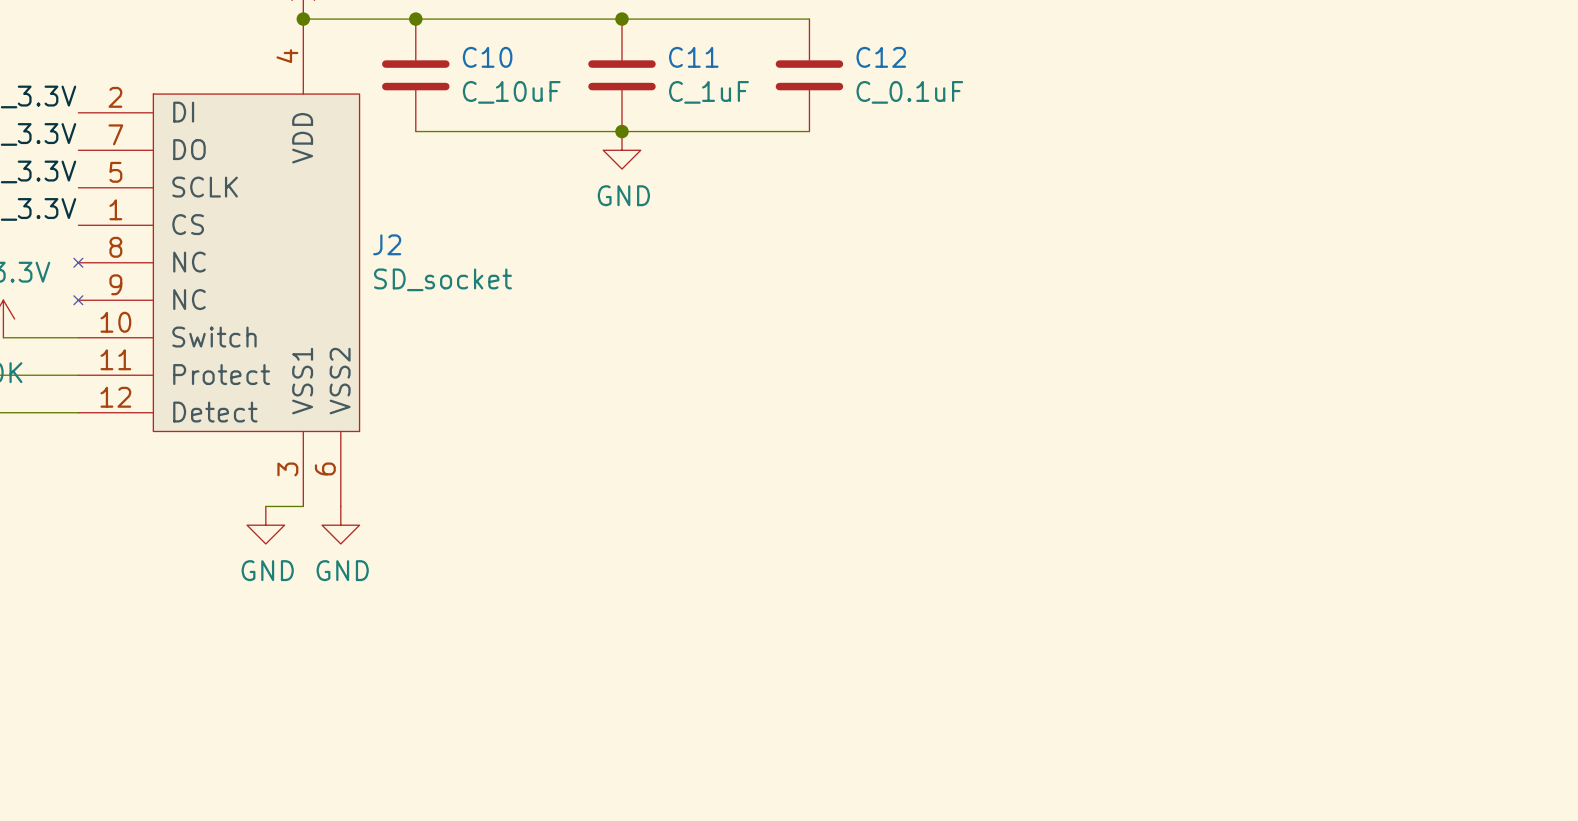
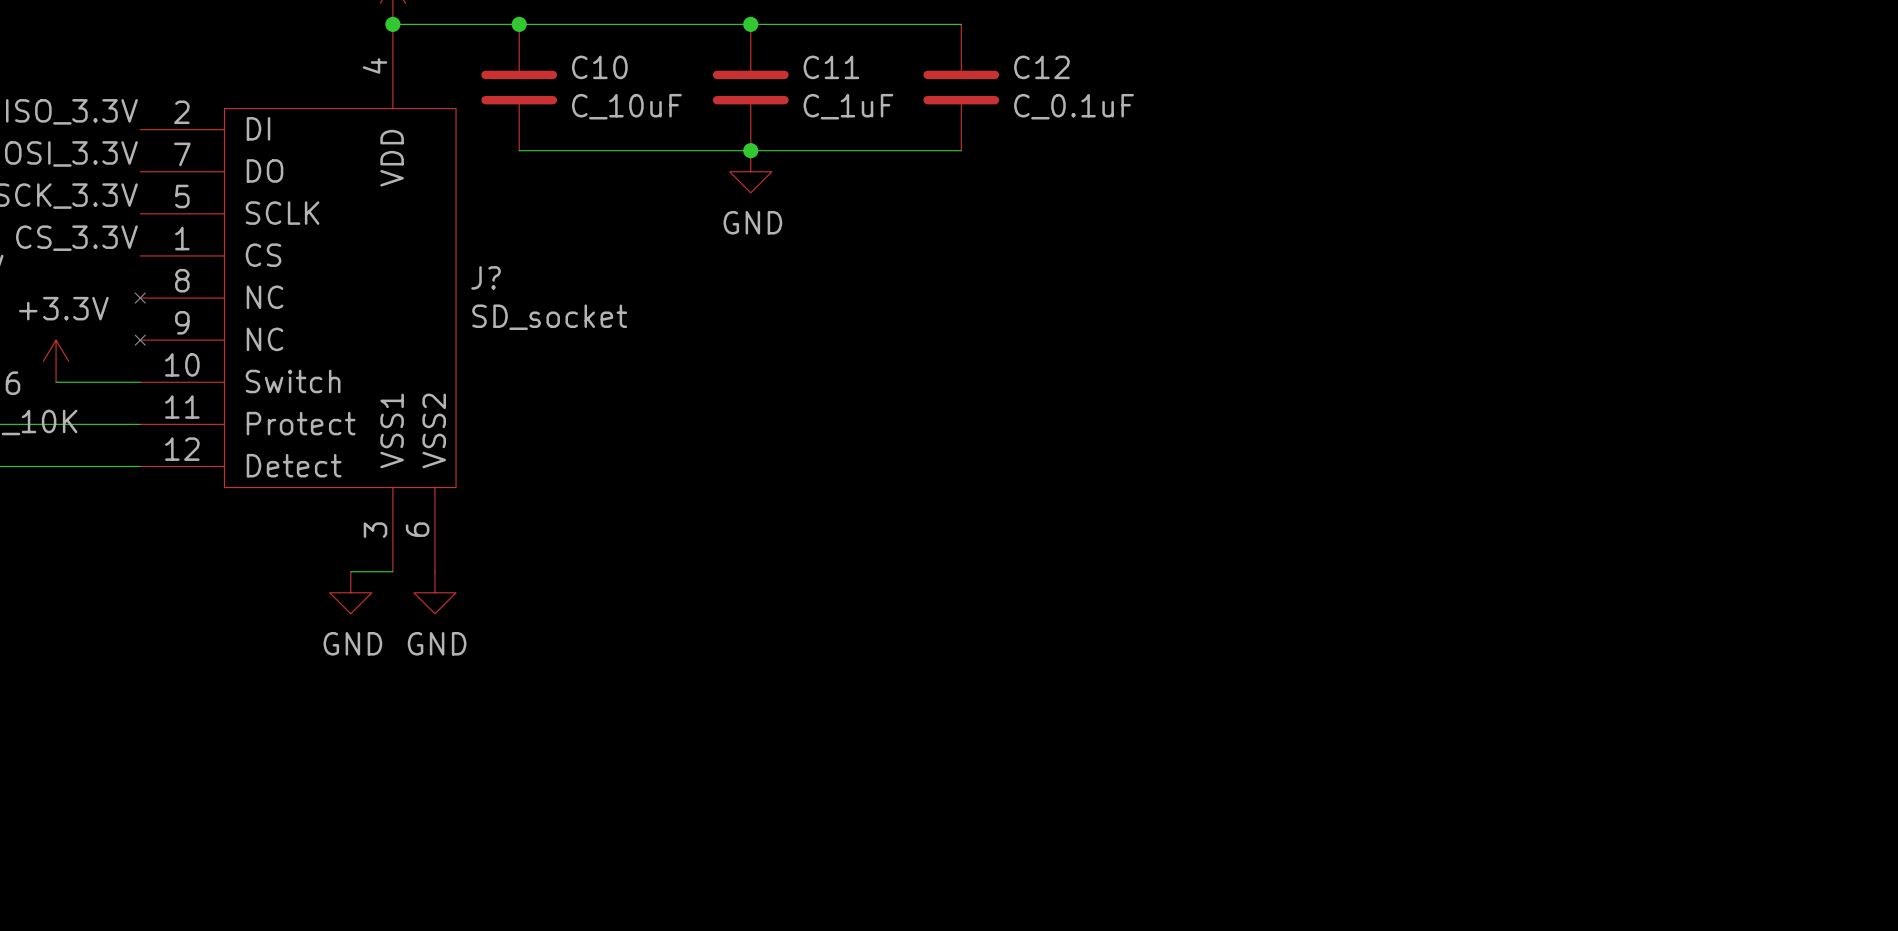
J2 name: J2 (387, 244) -> J? (486, 277)

